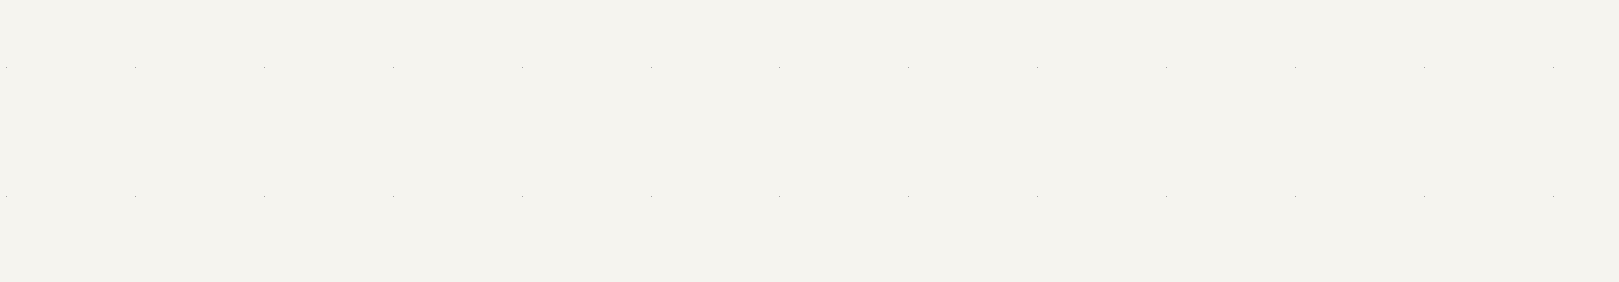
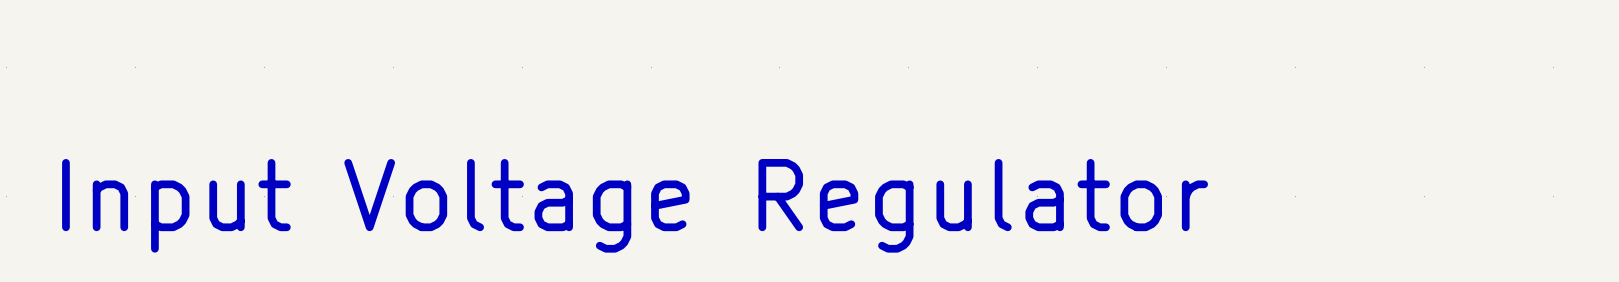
text: none -> Input Voltage Regulator (635, 205)

